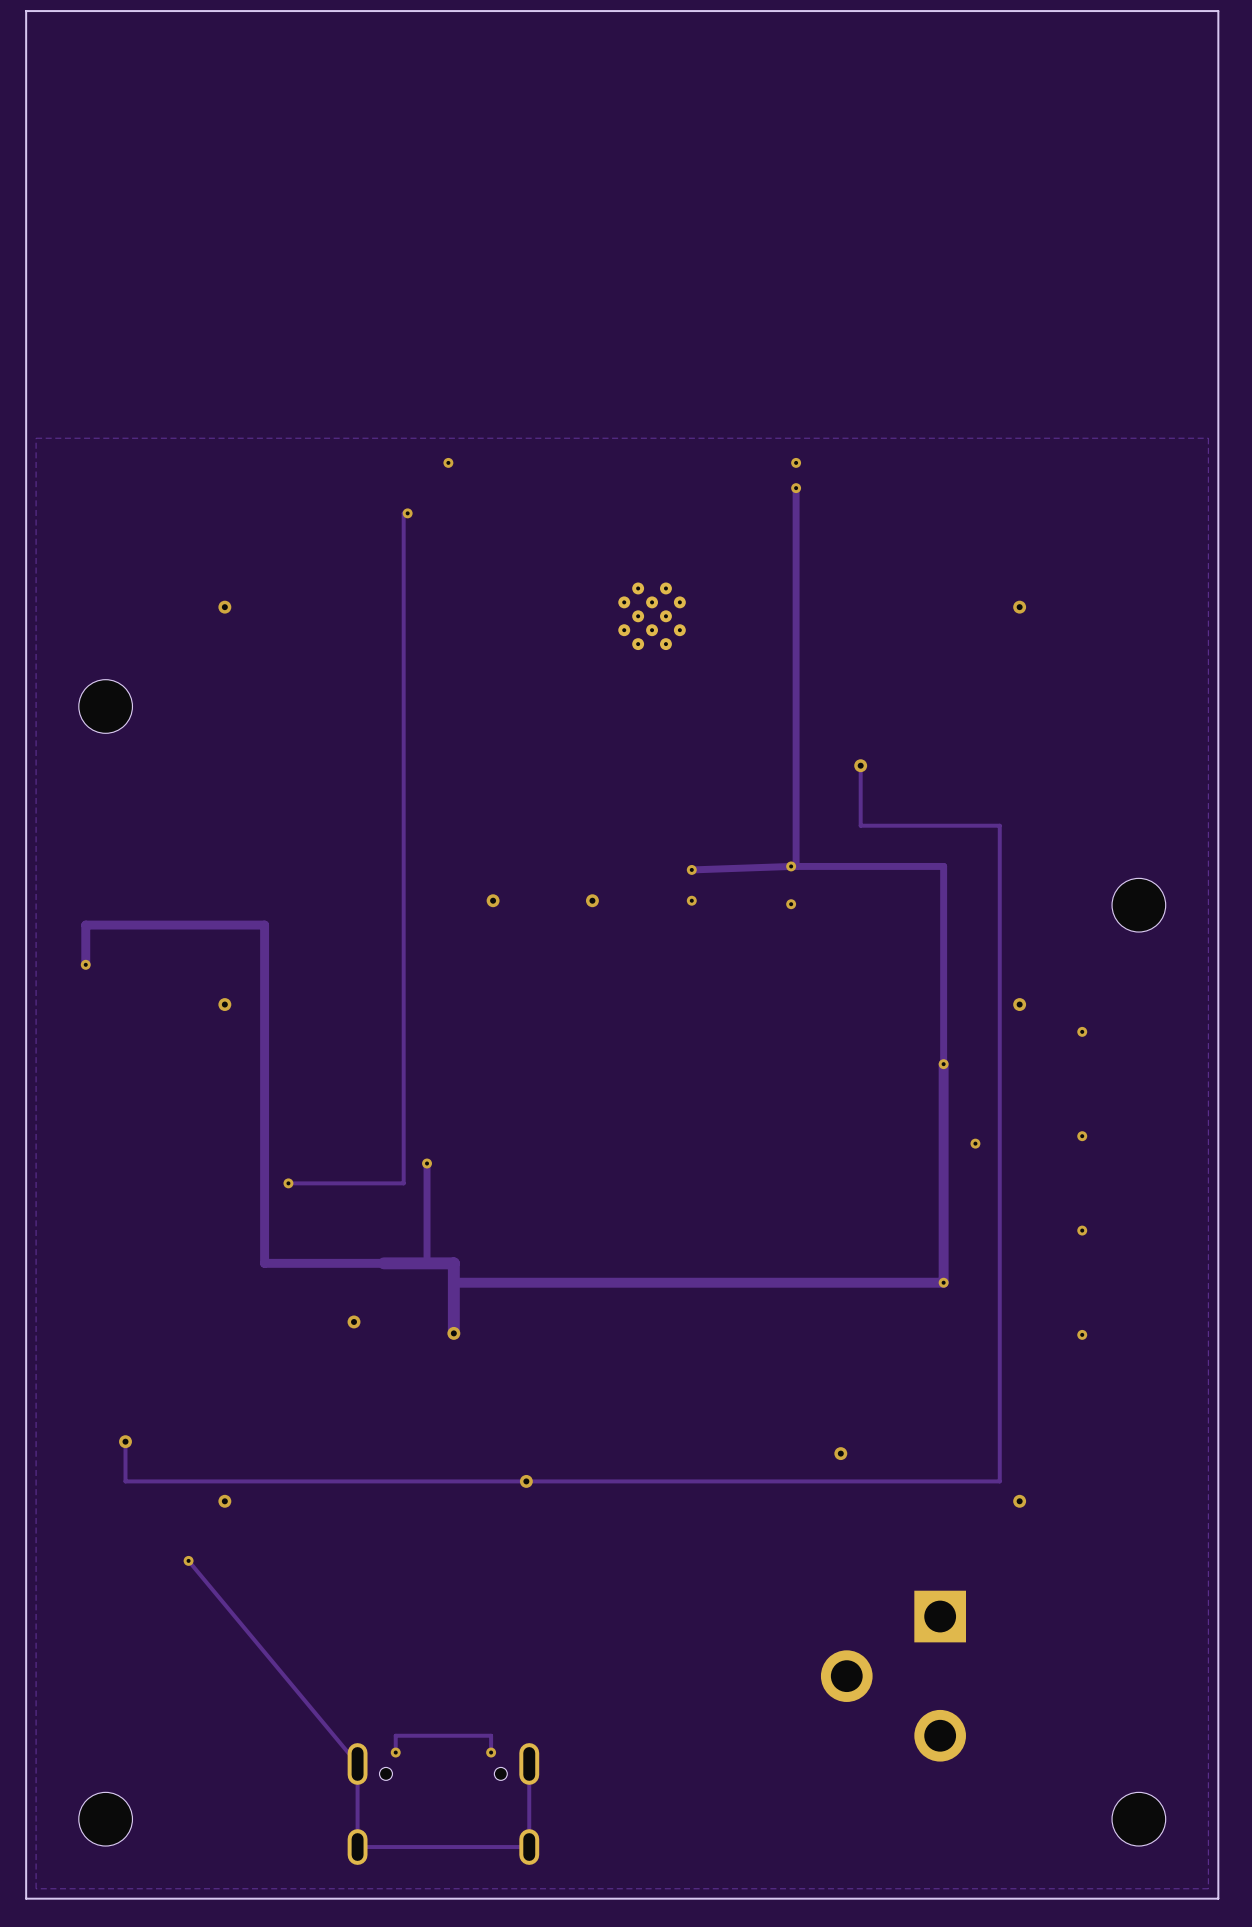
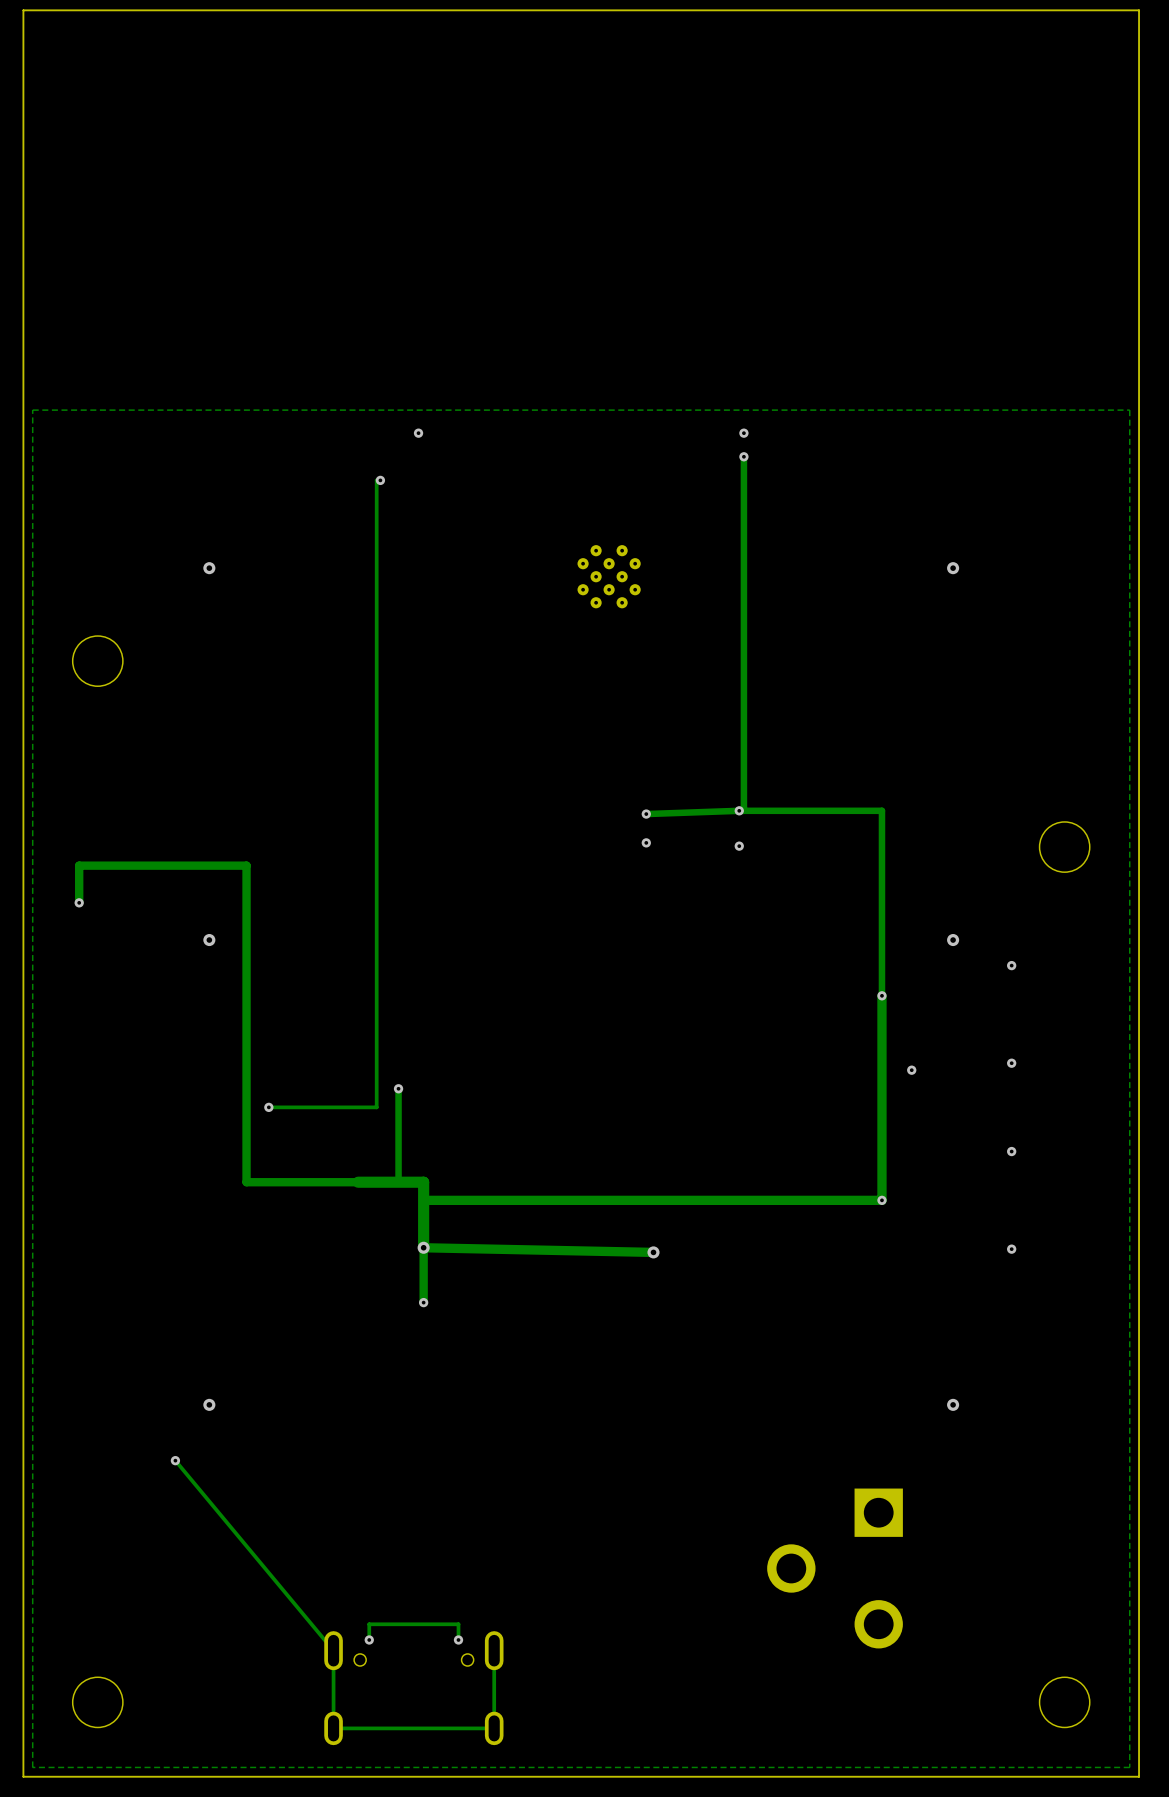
track: (860, 765) (860, 825) (999, 825) (999, 1481) (125, 1481) (125, 1441) -> none
via: (860, 765) -> none
via: (493, 900) -> none
via: (592, 900) -> none
via: (354, 1321) -> none
track: none -> (653, 1252) (423, 1247) (423, 1302)
via: none -> (653, 1252)
via: none -> (423, 1302)
via: (125, 1441) -> none
via: (840, 1453) -> none
via: (526, 1481) -> none

